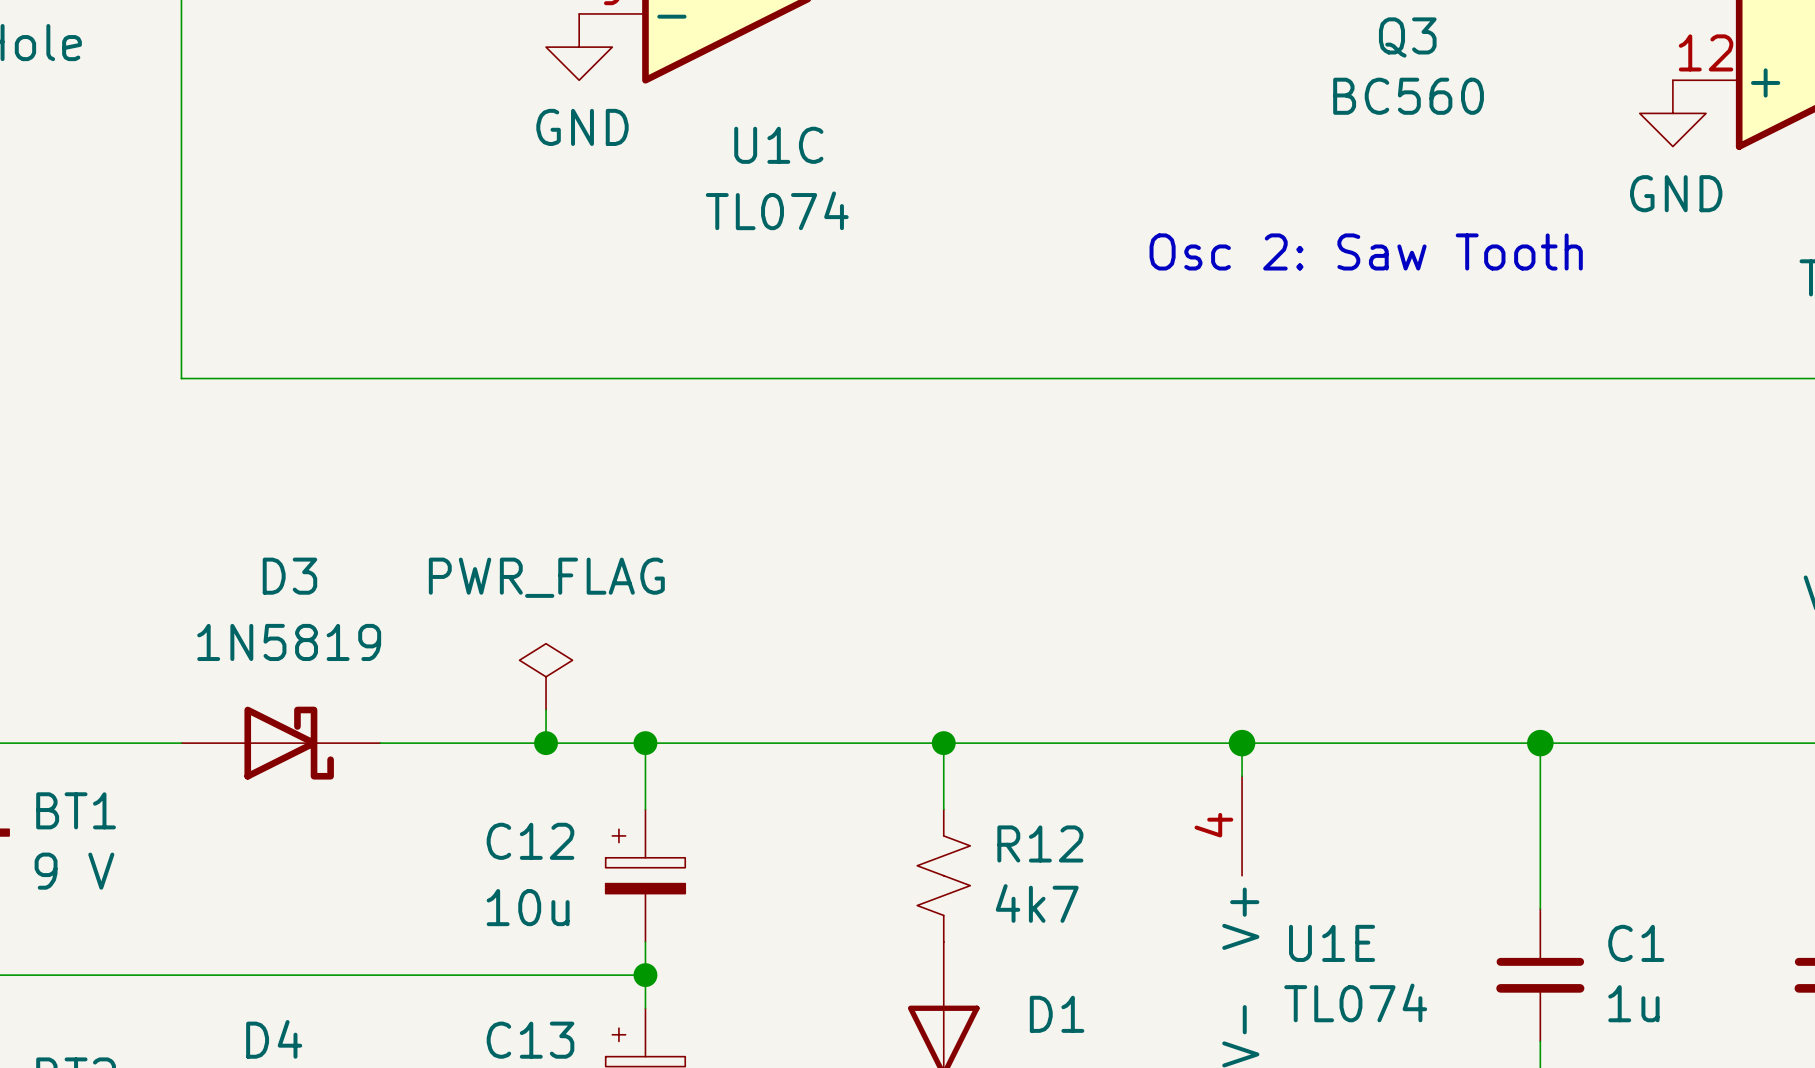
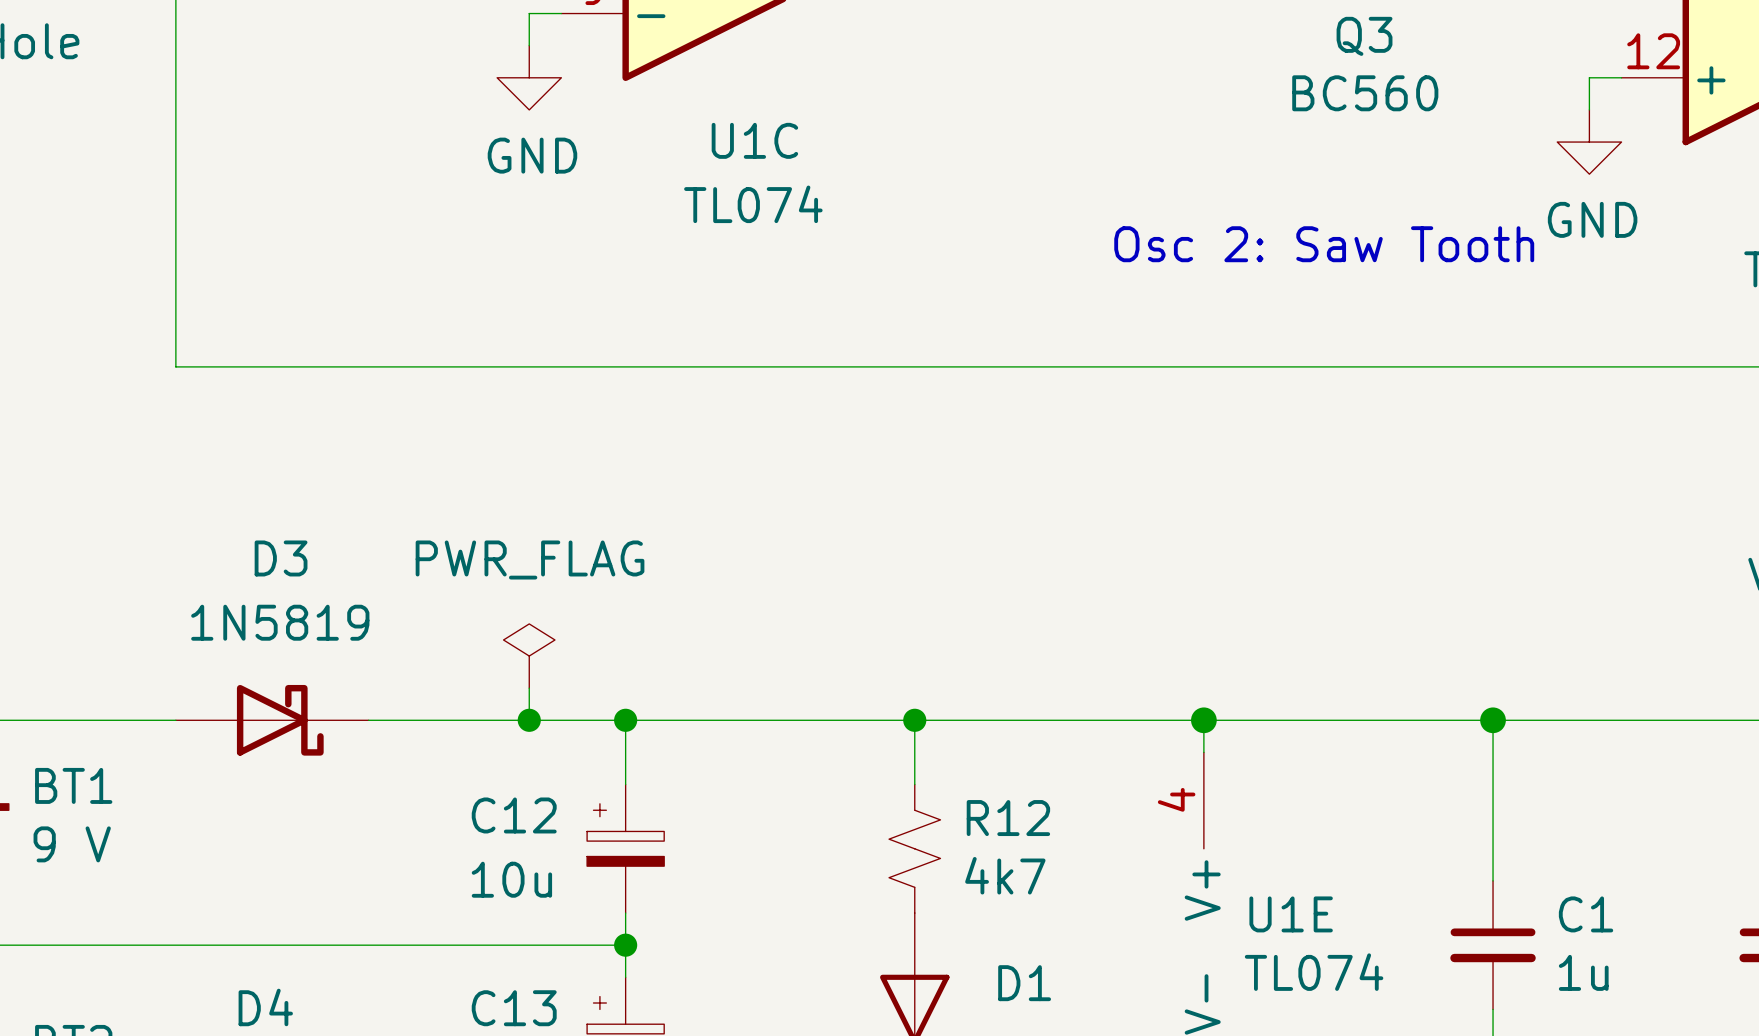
wire: none -> (561, 13) (529, 13) (529, 45)
power symbol position: GND (579, 47) -> GND (529, 77)
wire: none -> (1621, 77) (1589, 77) (1589, 109)
power symbol position: GND (1672, 113) -> GND (1589, 142)

